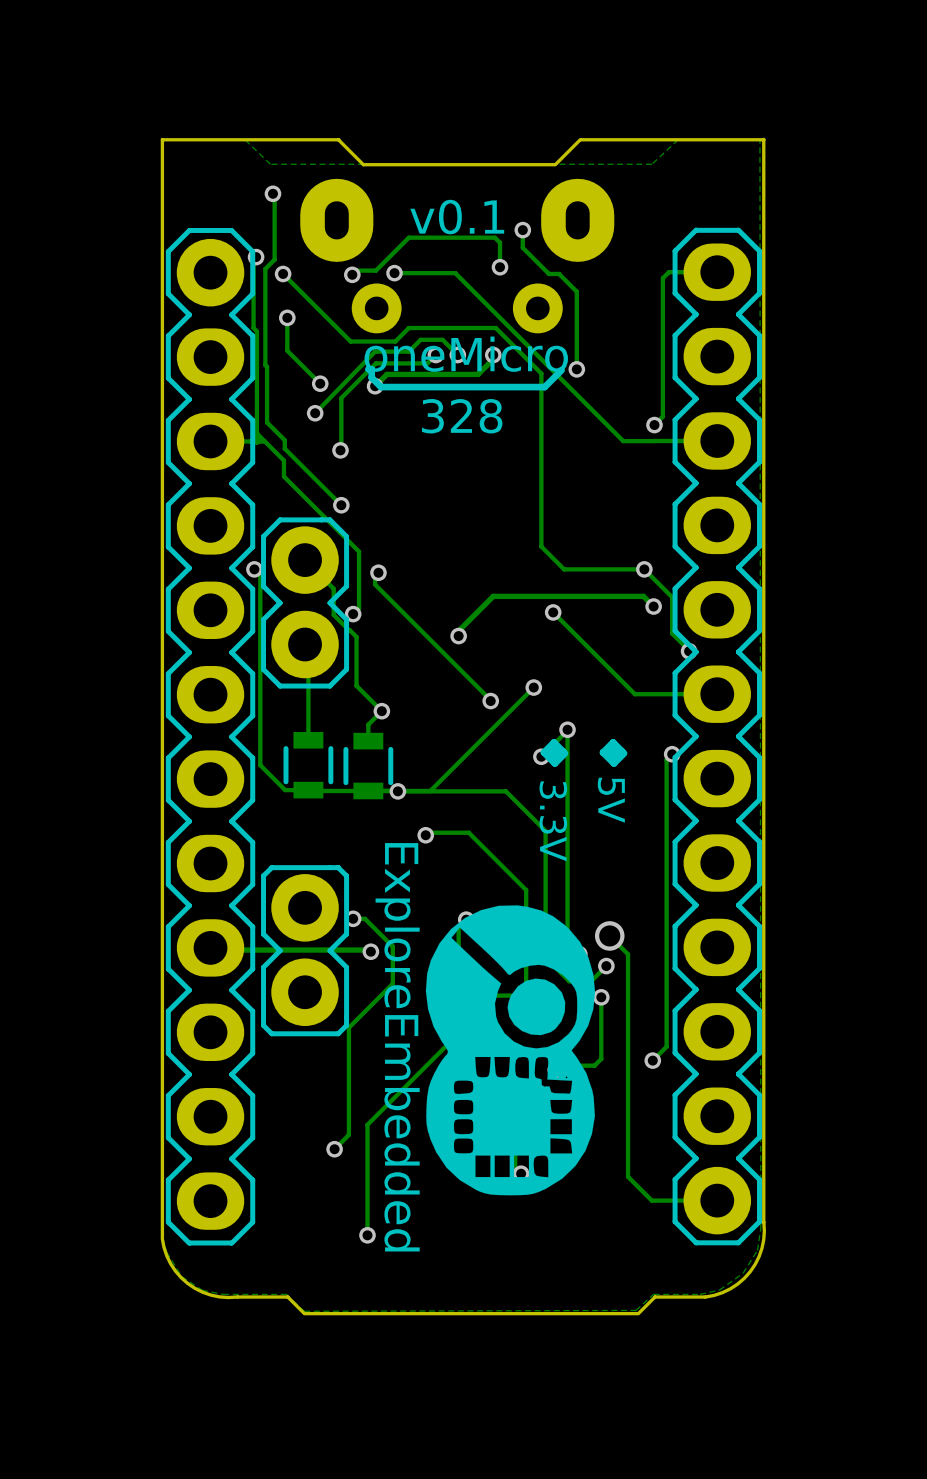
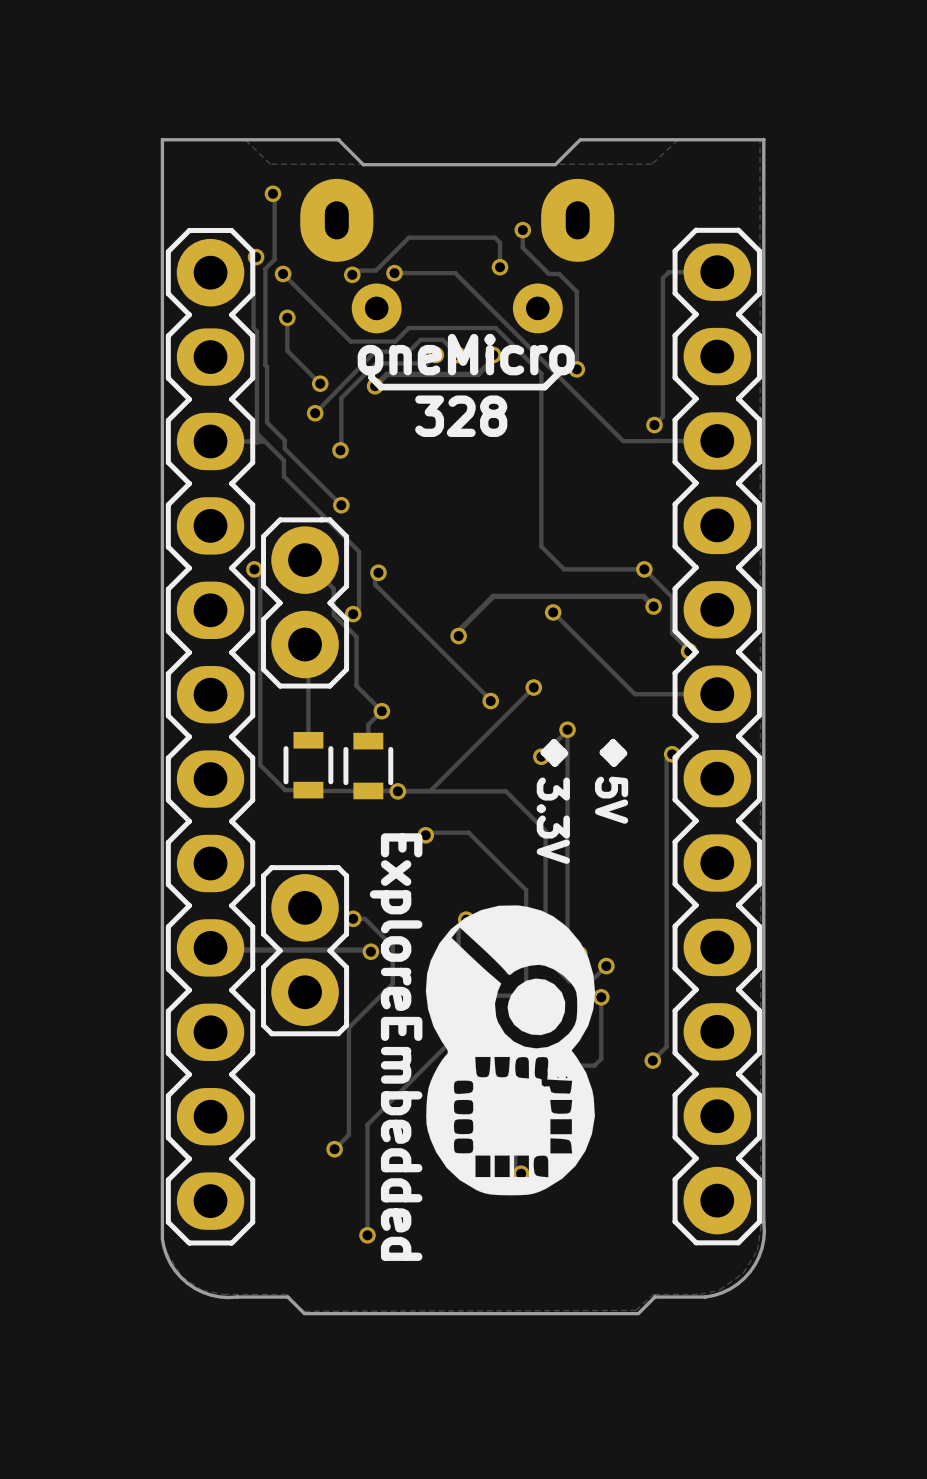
text: v0.1 (457, 217) -> none
track: (609, 935) (628, 954) (628, 1176) (651, 1200) (717, 1200) -> none
via: (609, 935) -> none

